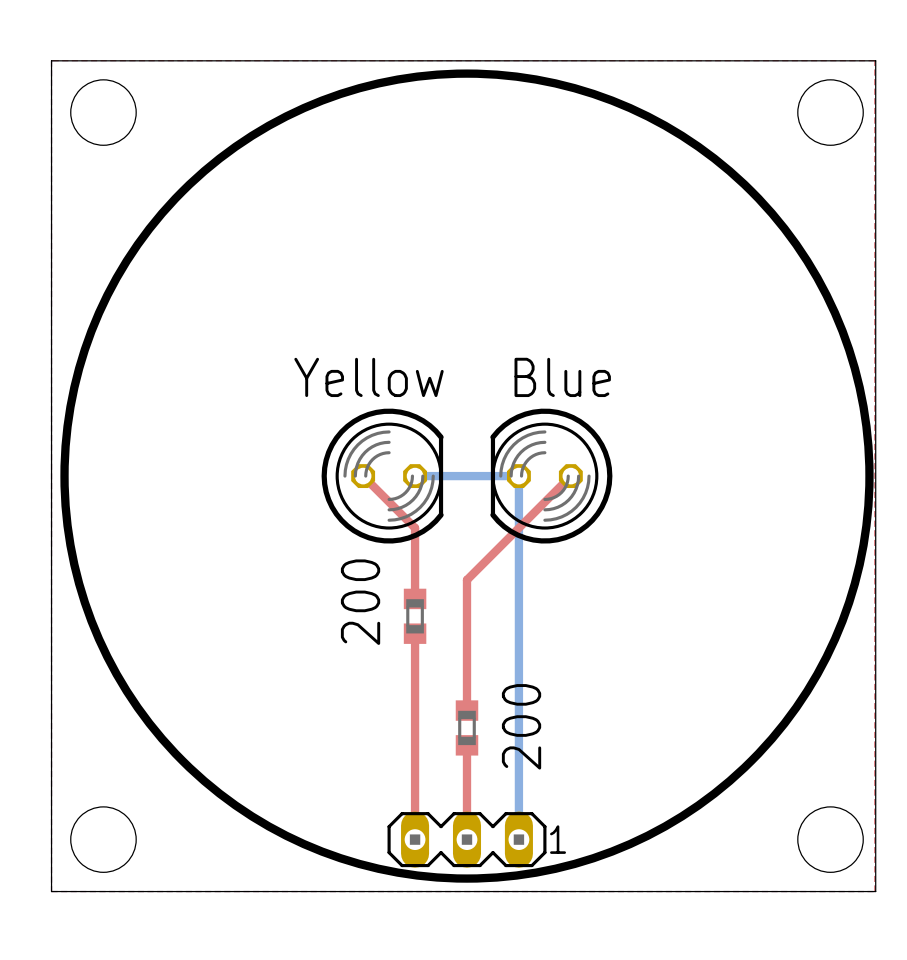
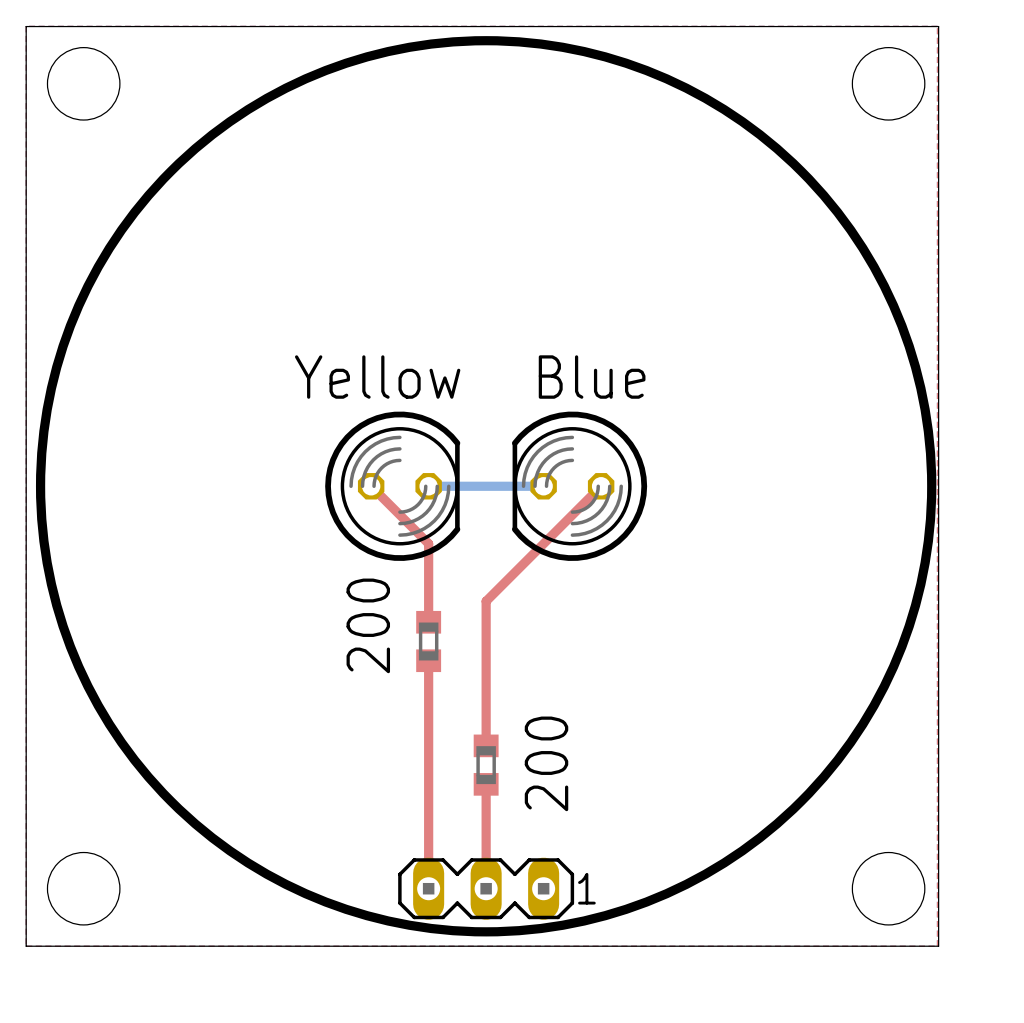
bottom track: (518, 476) (518, 839) -> none

